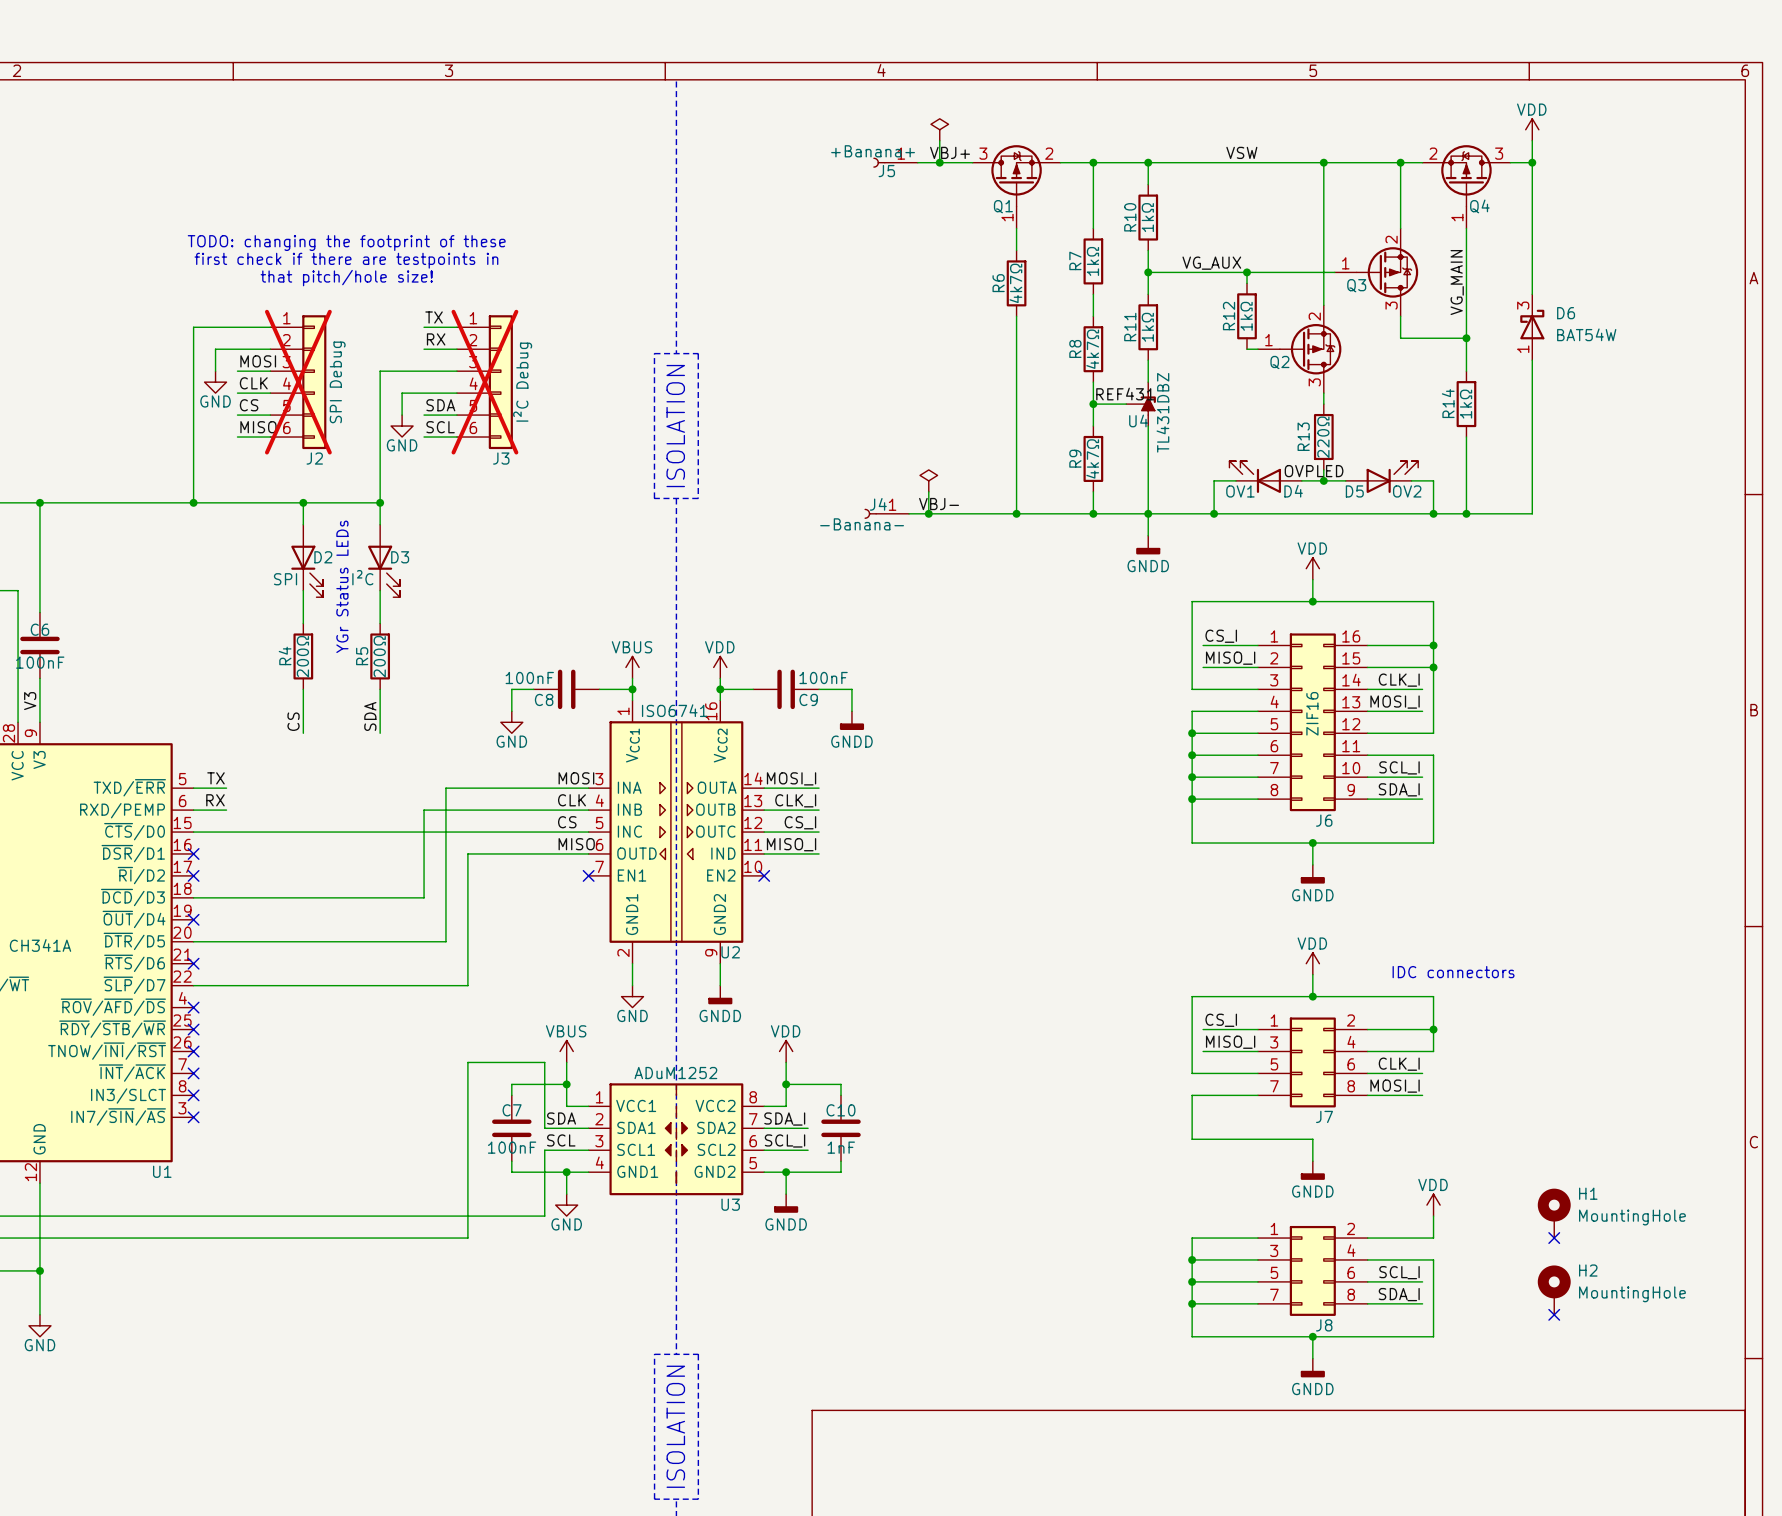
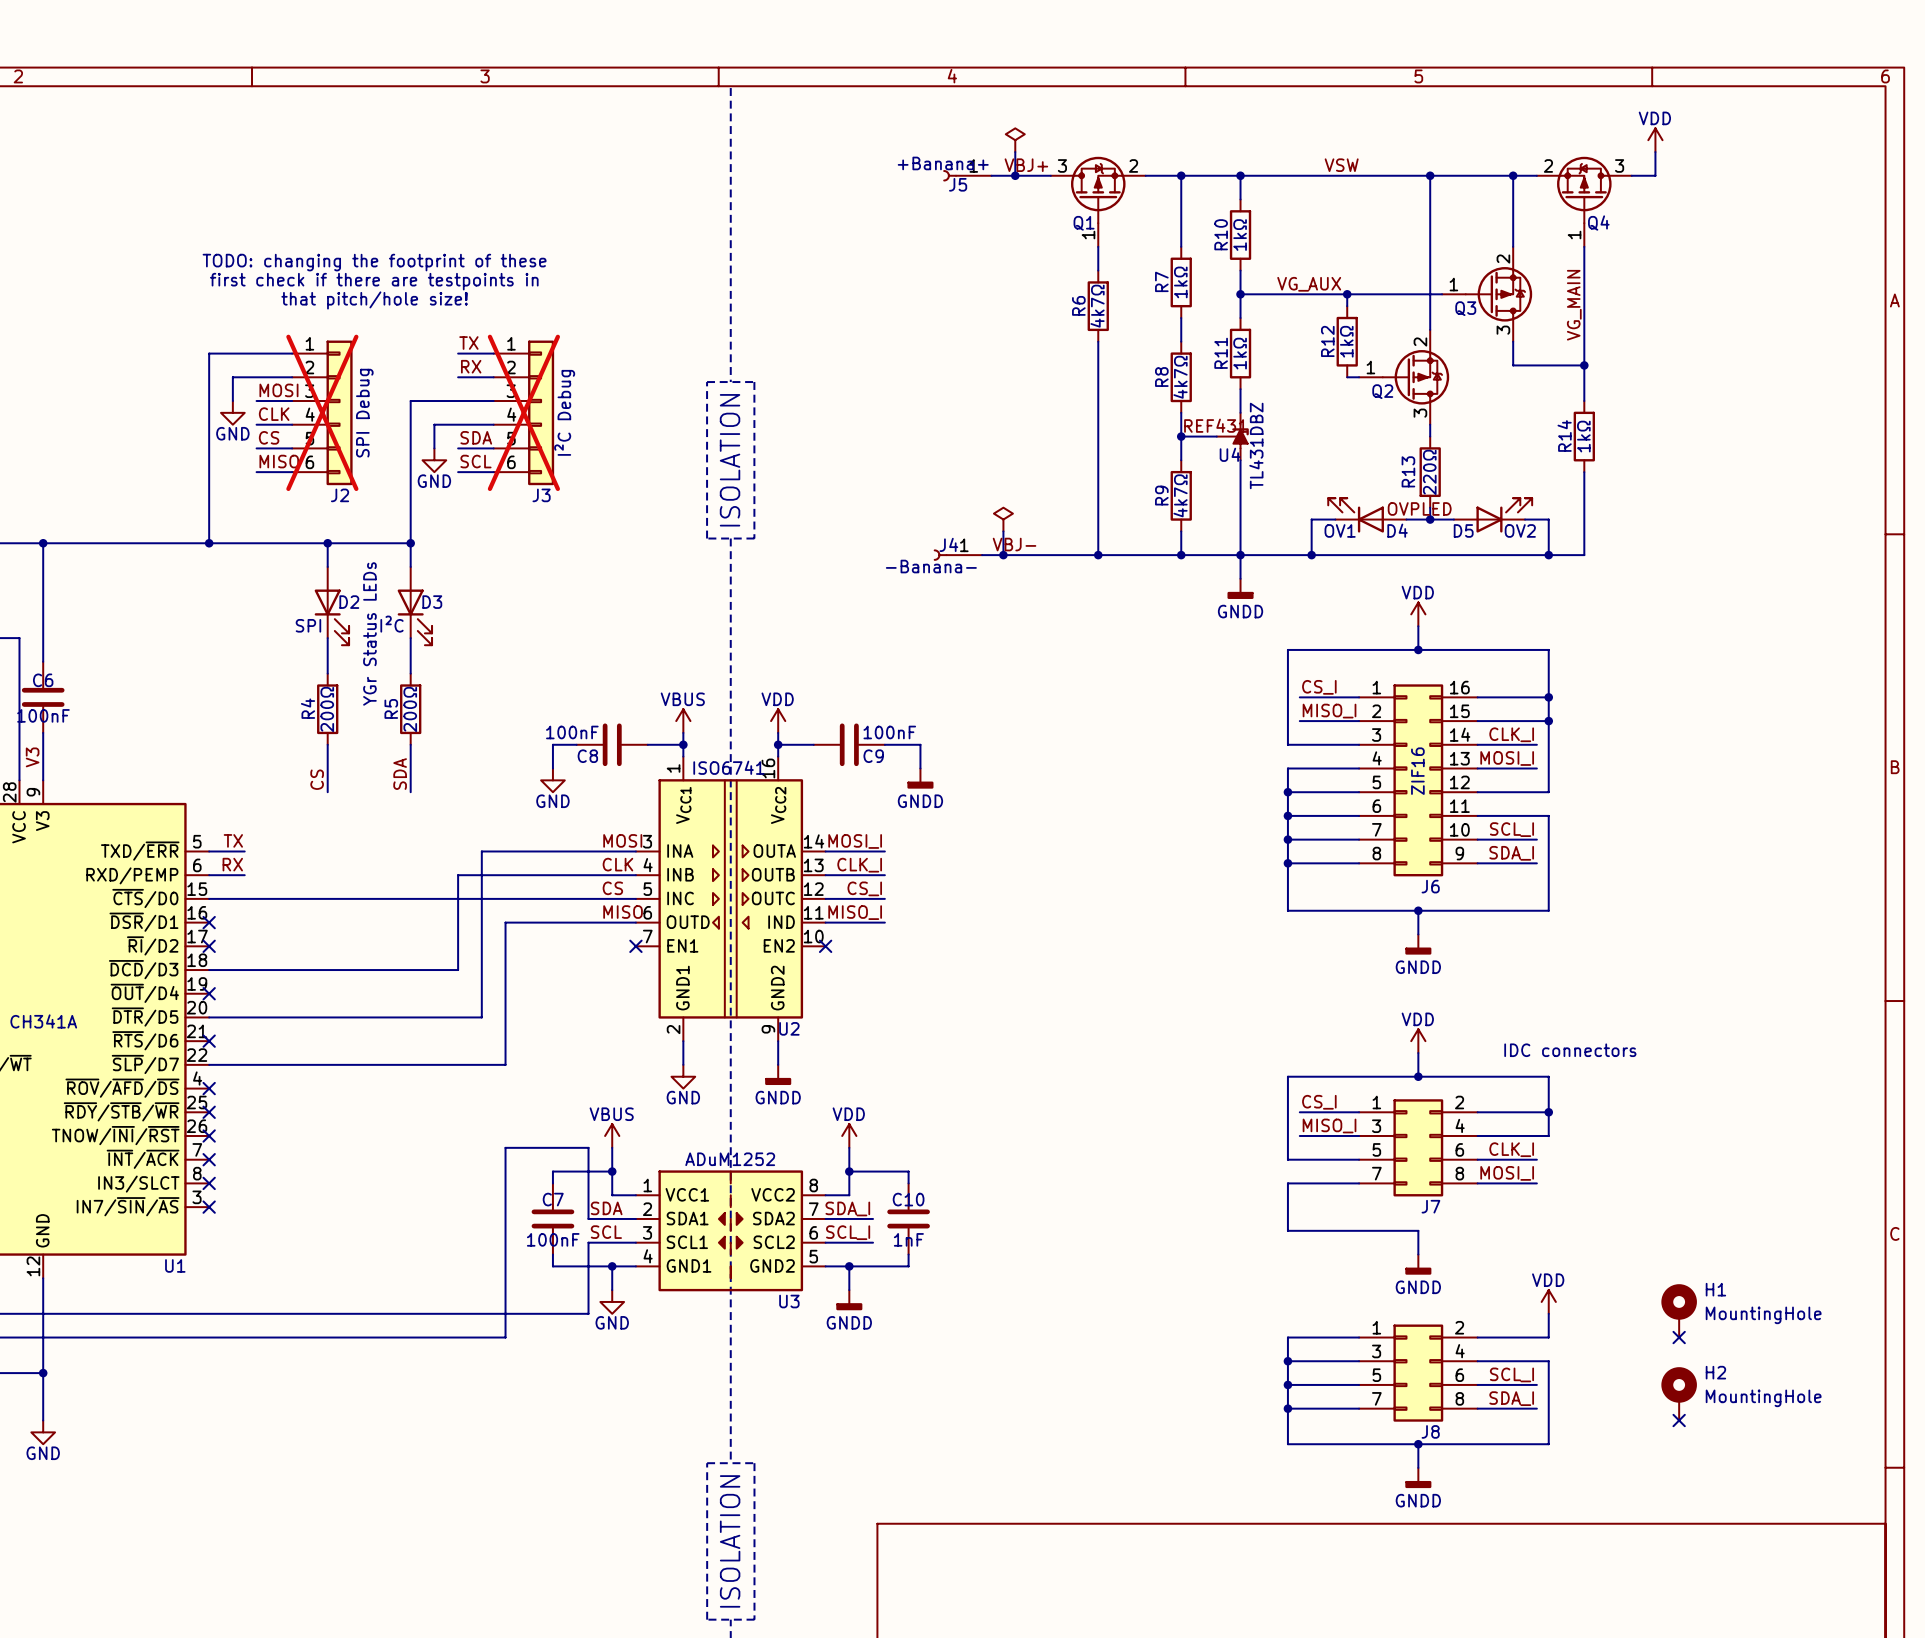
wire: (1532, 162) (1532, 294) -> none
junction: (1532, 162) -> none
D6: BAT54W (1532, 327) -> none
wire: (1532, 360) (1532, 513) (1466, 513) -> none
junction: (1466, 513) -> none

